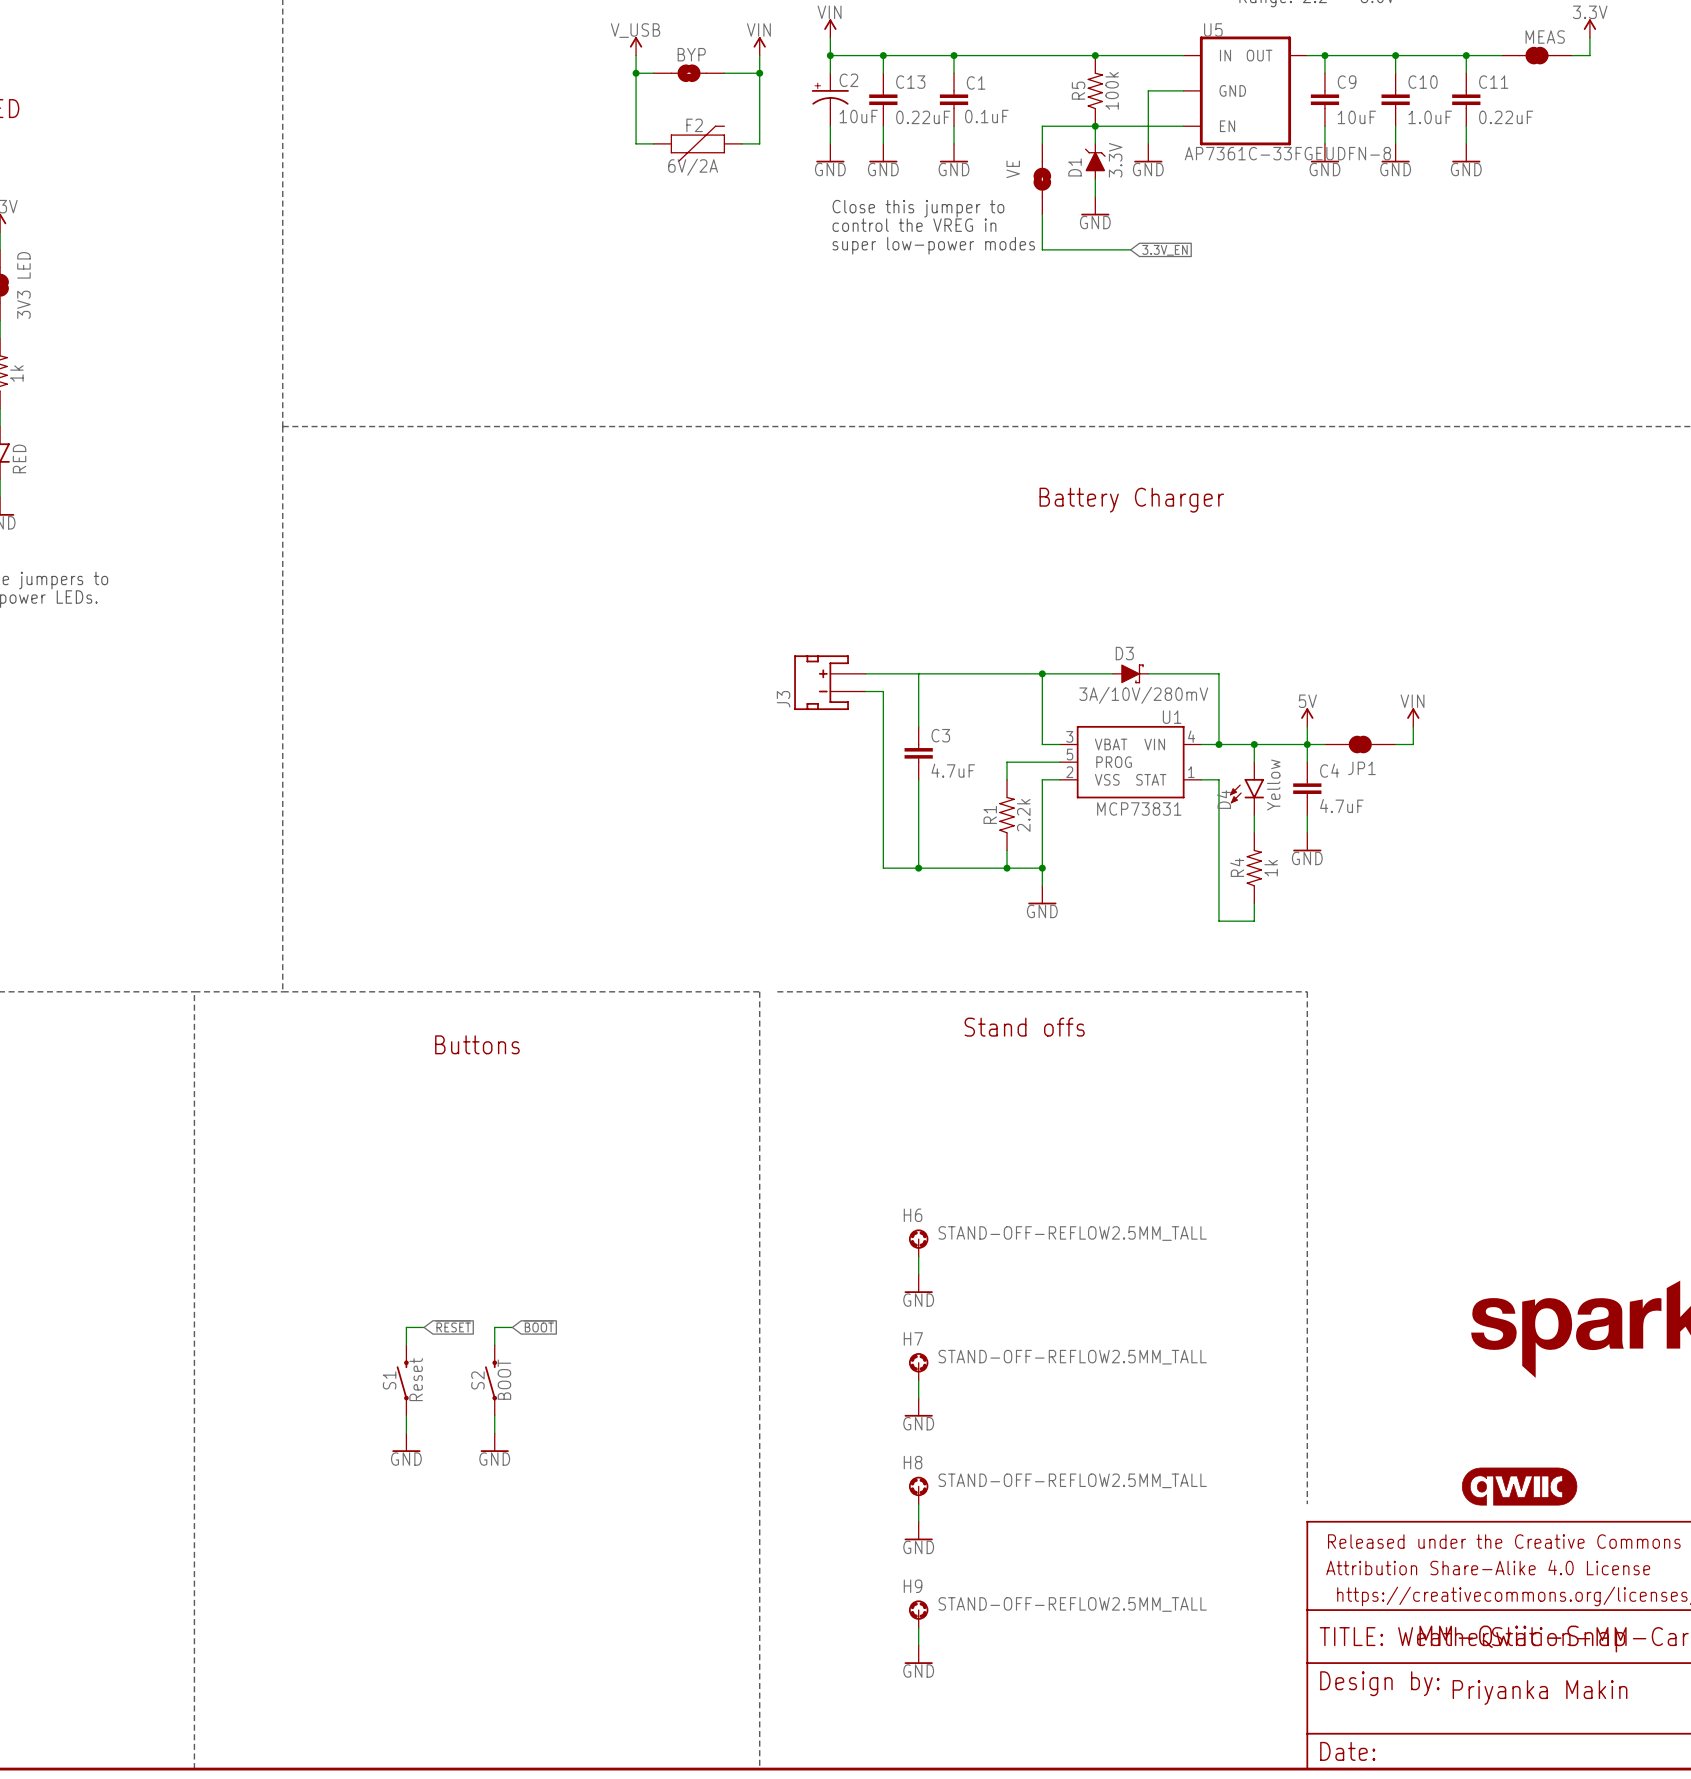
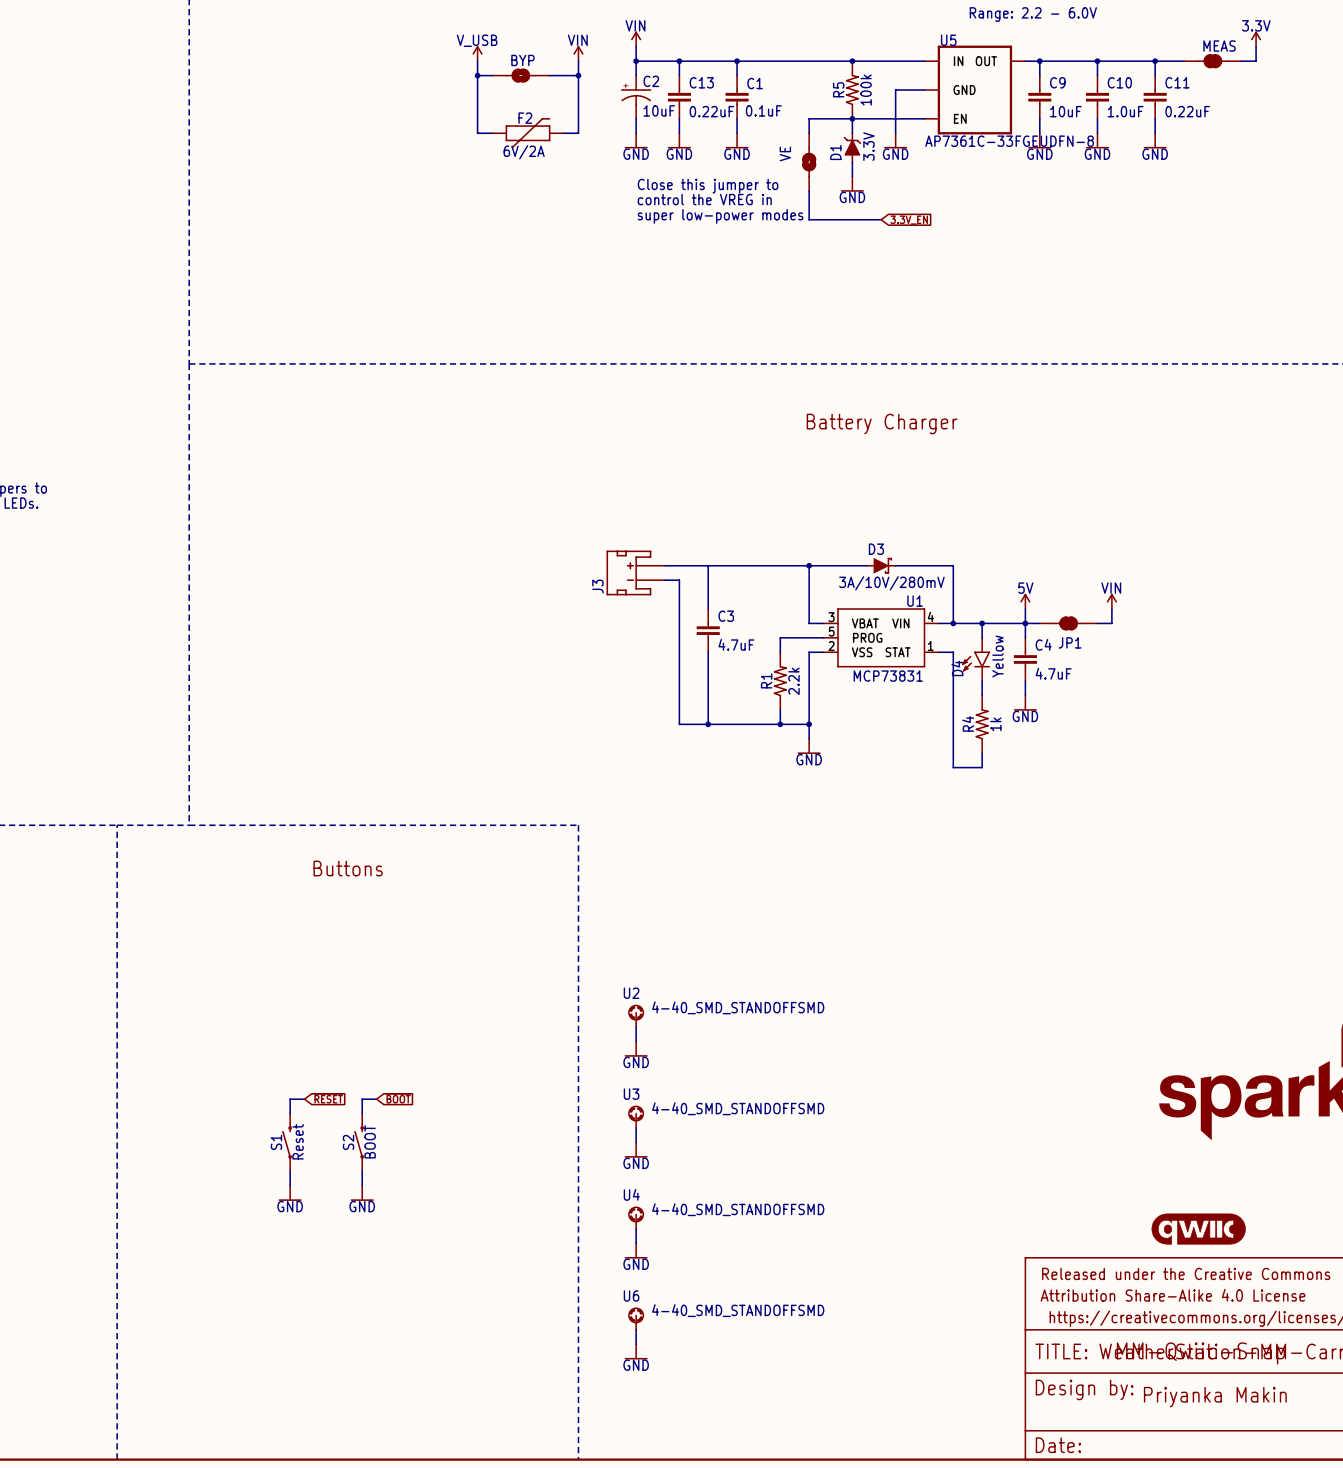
line: (777, 991) (1307, 991) (1307, 1504) -> none
text: Stand offs (1024, 1027) -> none
U2: none -> 4-40_SMD_STANDOFFSMD (636, 1015)
H6: STAND-OFF-REFLOW2.5MM_TALL (918, 1243) -> none
wire: (918, 1256) (918, 1274) -> (636, 1027) (636, 1041)
power symbol: none -> GND (636, 1049)
power symbol: GND (918, 1283) -> none
U3: none -> 4-40_SMD_STANDOFFSMD (636, 1116)
H7: STAND-OFF-REFLOW2.5MM_TALL (918, 1366) -> none
wire: (918, 1380) (918, 1398) -> (636, 1128) (636, 1142)
power symbol: none -> GND (636, 1150)
power symbol: GND (918, 1407) -> none
U4: none -> 4-40_SMD_STANDOFFSMD (636, 1217)
H8: STAND-OFF-REFLOW2.5MM_TALL (918, 1490) -> none
wire: (918, 1504) (918, 1521) -> (636, 1228) (636, 1243)
power symbol: none -> GND (636, 1250)
power symbol: GND (918, 1531) -> none
U6: none -> 4-40_SMD_STANDOFFSMD (636, 1318)
H9: STAND-OFF-REFLOW2.5MM_TALL (918, 1614) -> none
wire: (918, 1627) (918, 1645) -> (636, 1329) (636, 1344)
power symbol: none -> GND (636, 1351)
power symbol: GND (918, 1654) -> none

